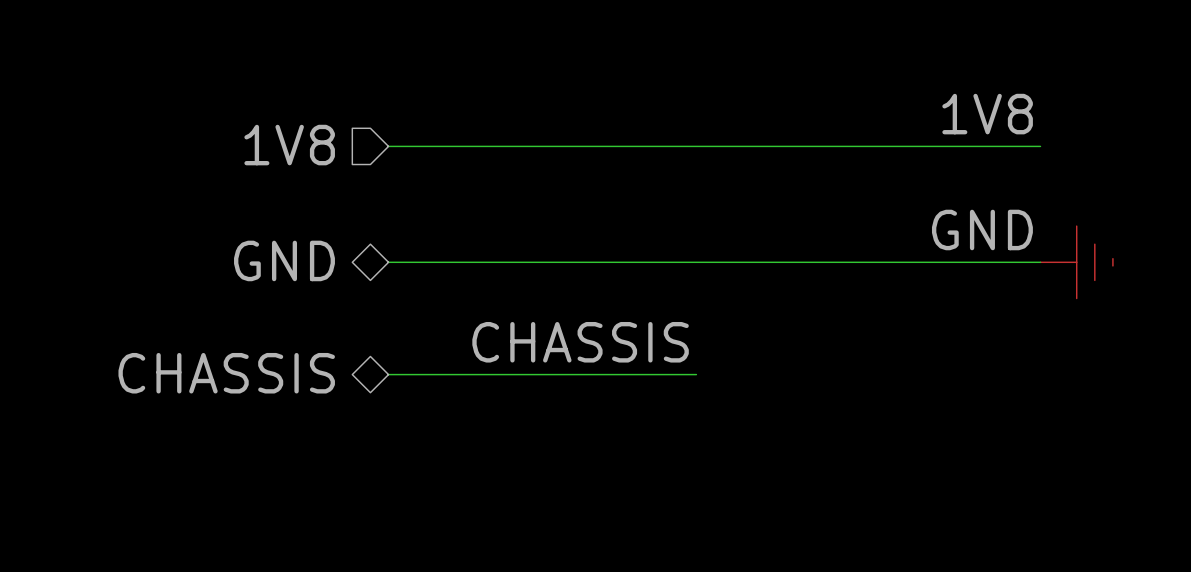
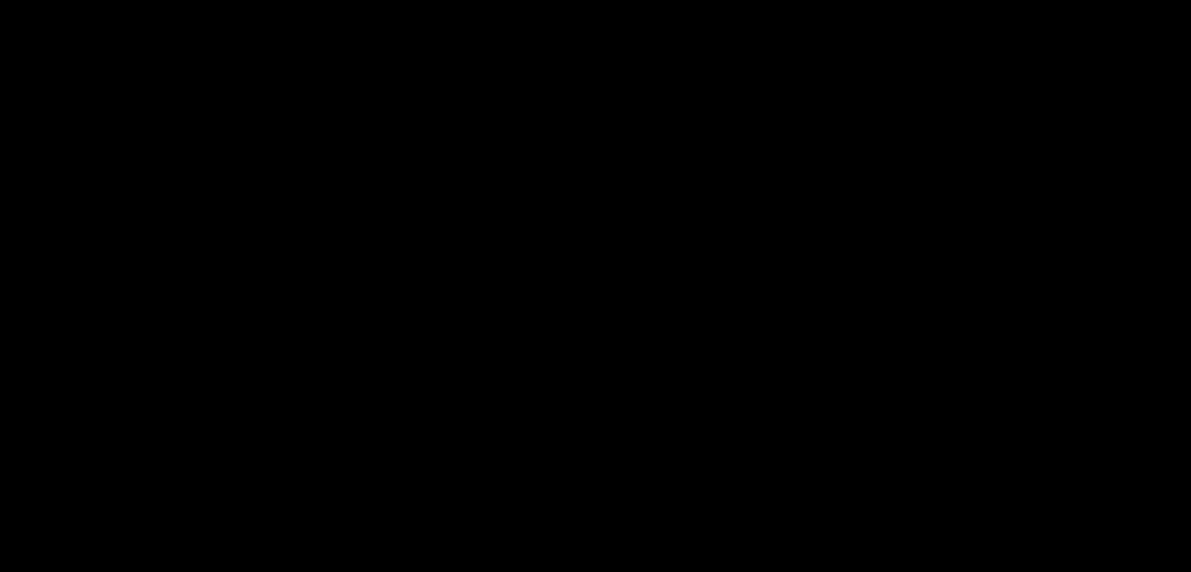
label: 1V8 (987, 114) -> none
hierarchical label: 1V8 (289, 145) -> none
wire: (388, 146) (1040, 146) -> none
label: GND (982, 229) -> none
hierarchical label: GND (284, 260) -> none
wire: (388, 262) (1040, 262) -> none
power symbol: (1076, 262) -> none
label: CHASSIS (580, 342) -> none
hierarchical label: CHASSIS (226, 373) -> none
wire: (388, 374) (696, 374) -> none

